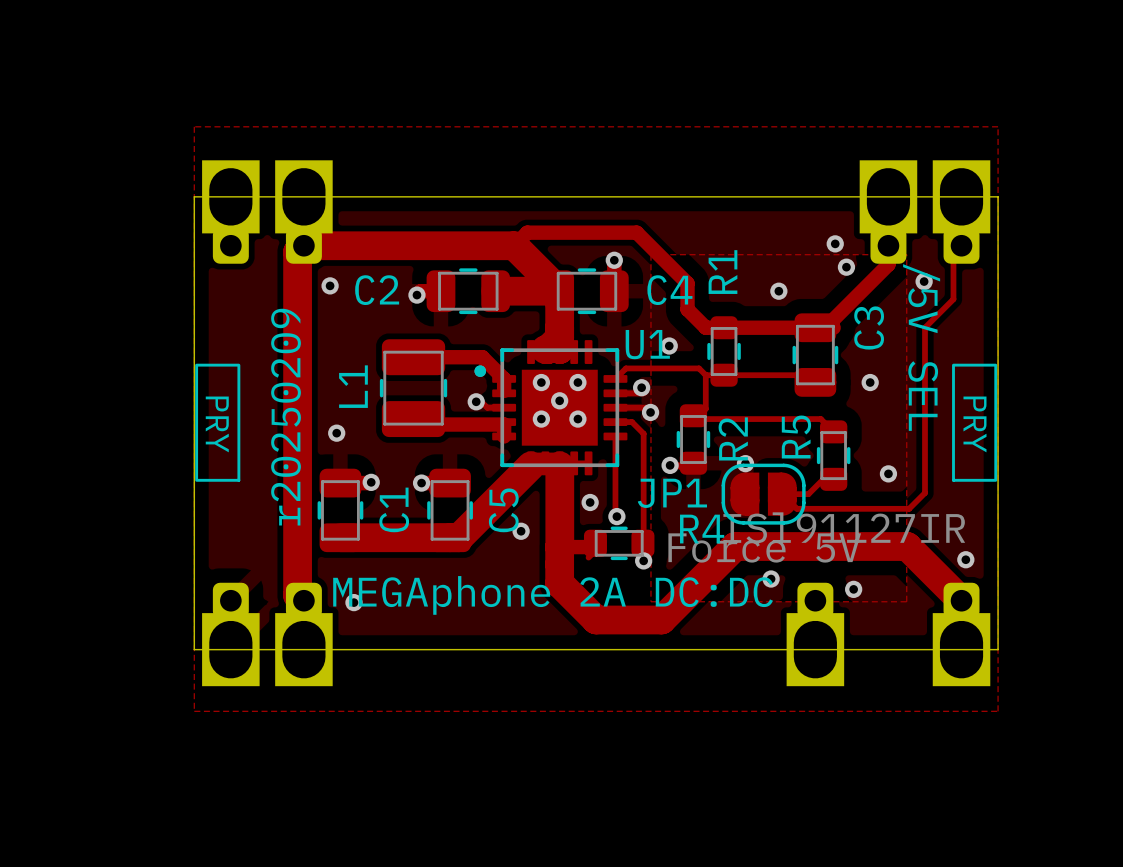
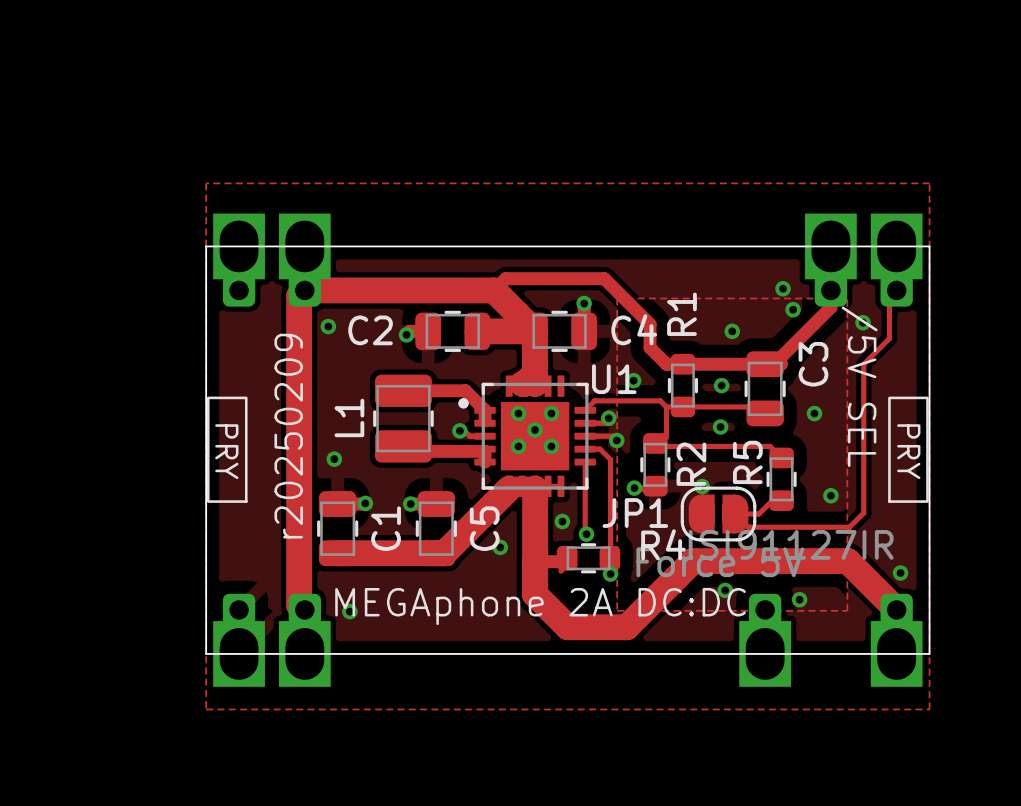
via: none -> (721, 385)
via: none -> (720, 427)

